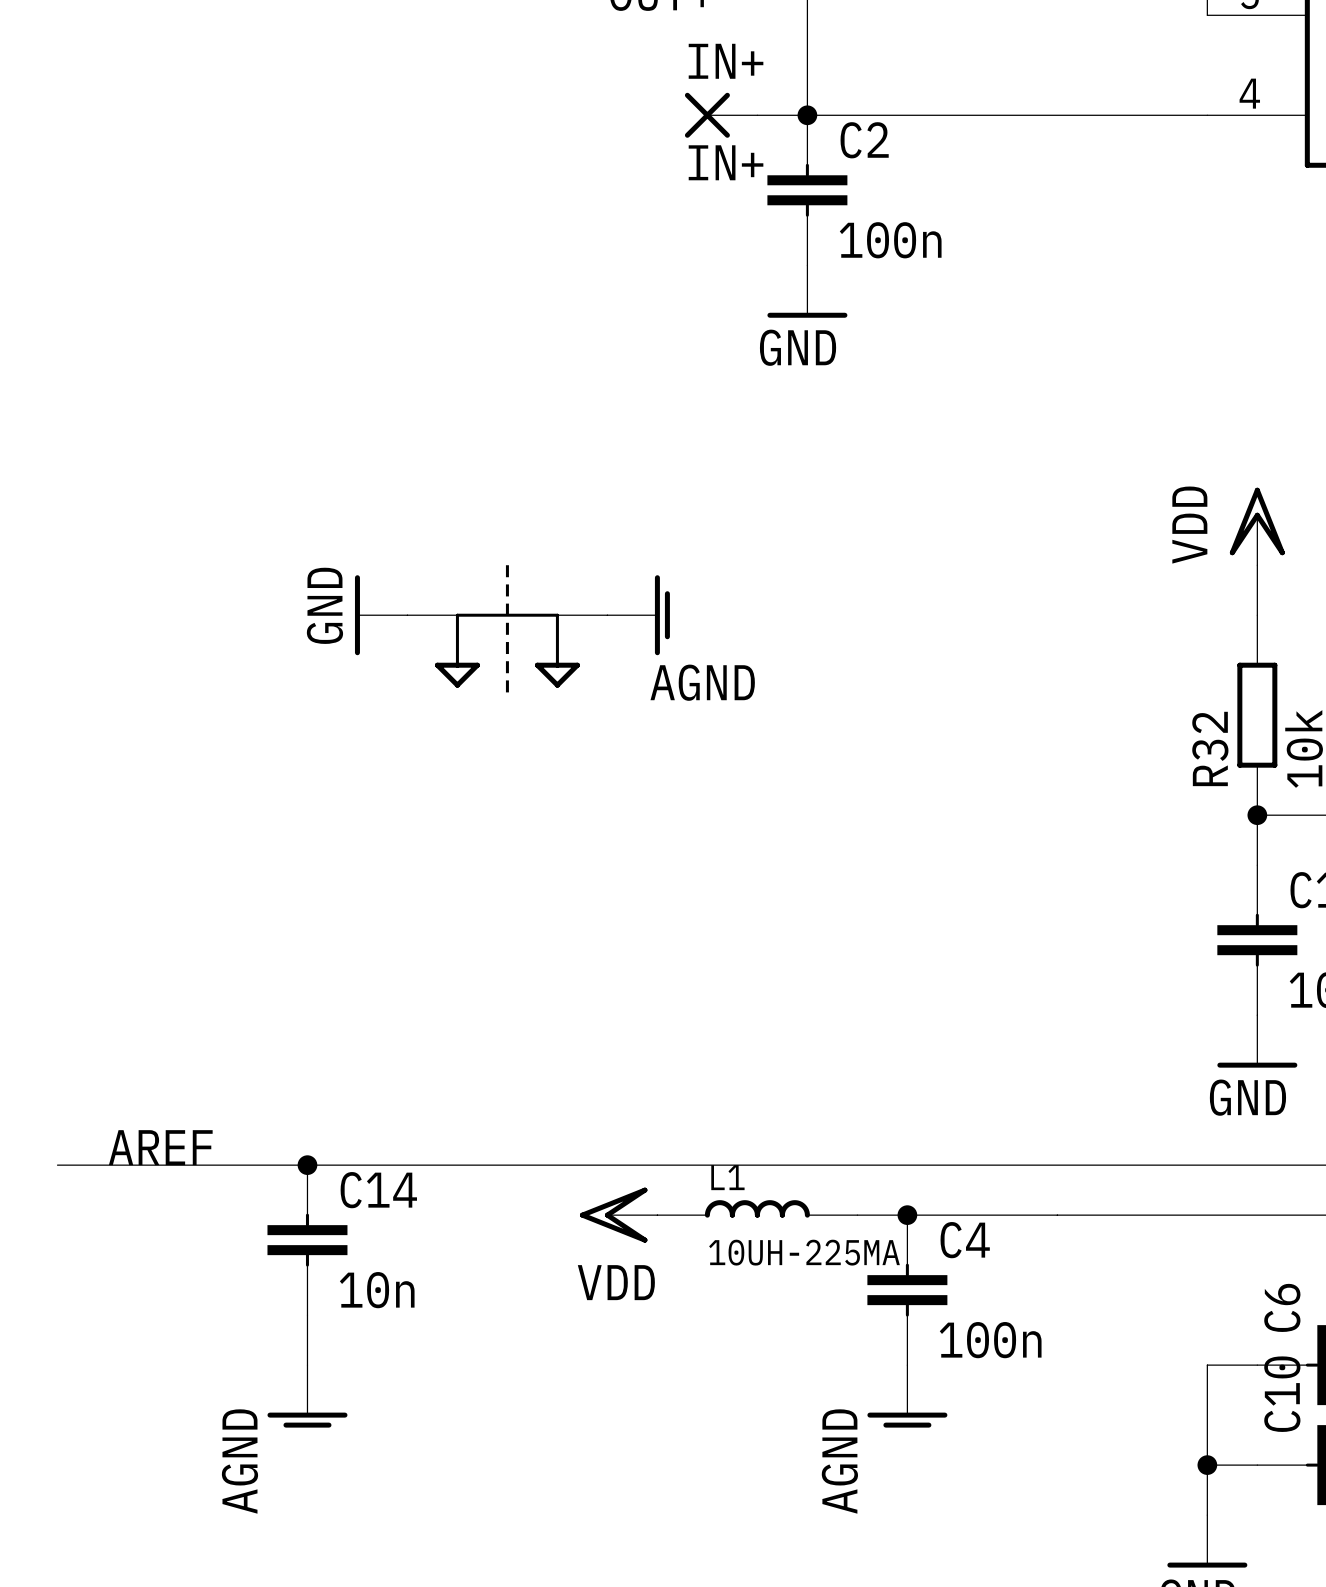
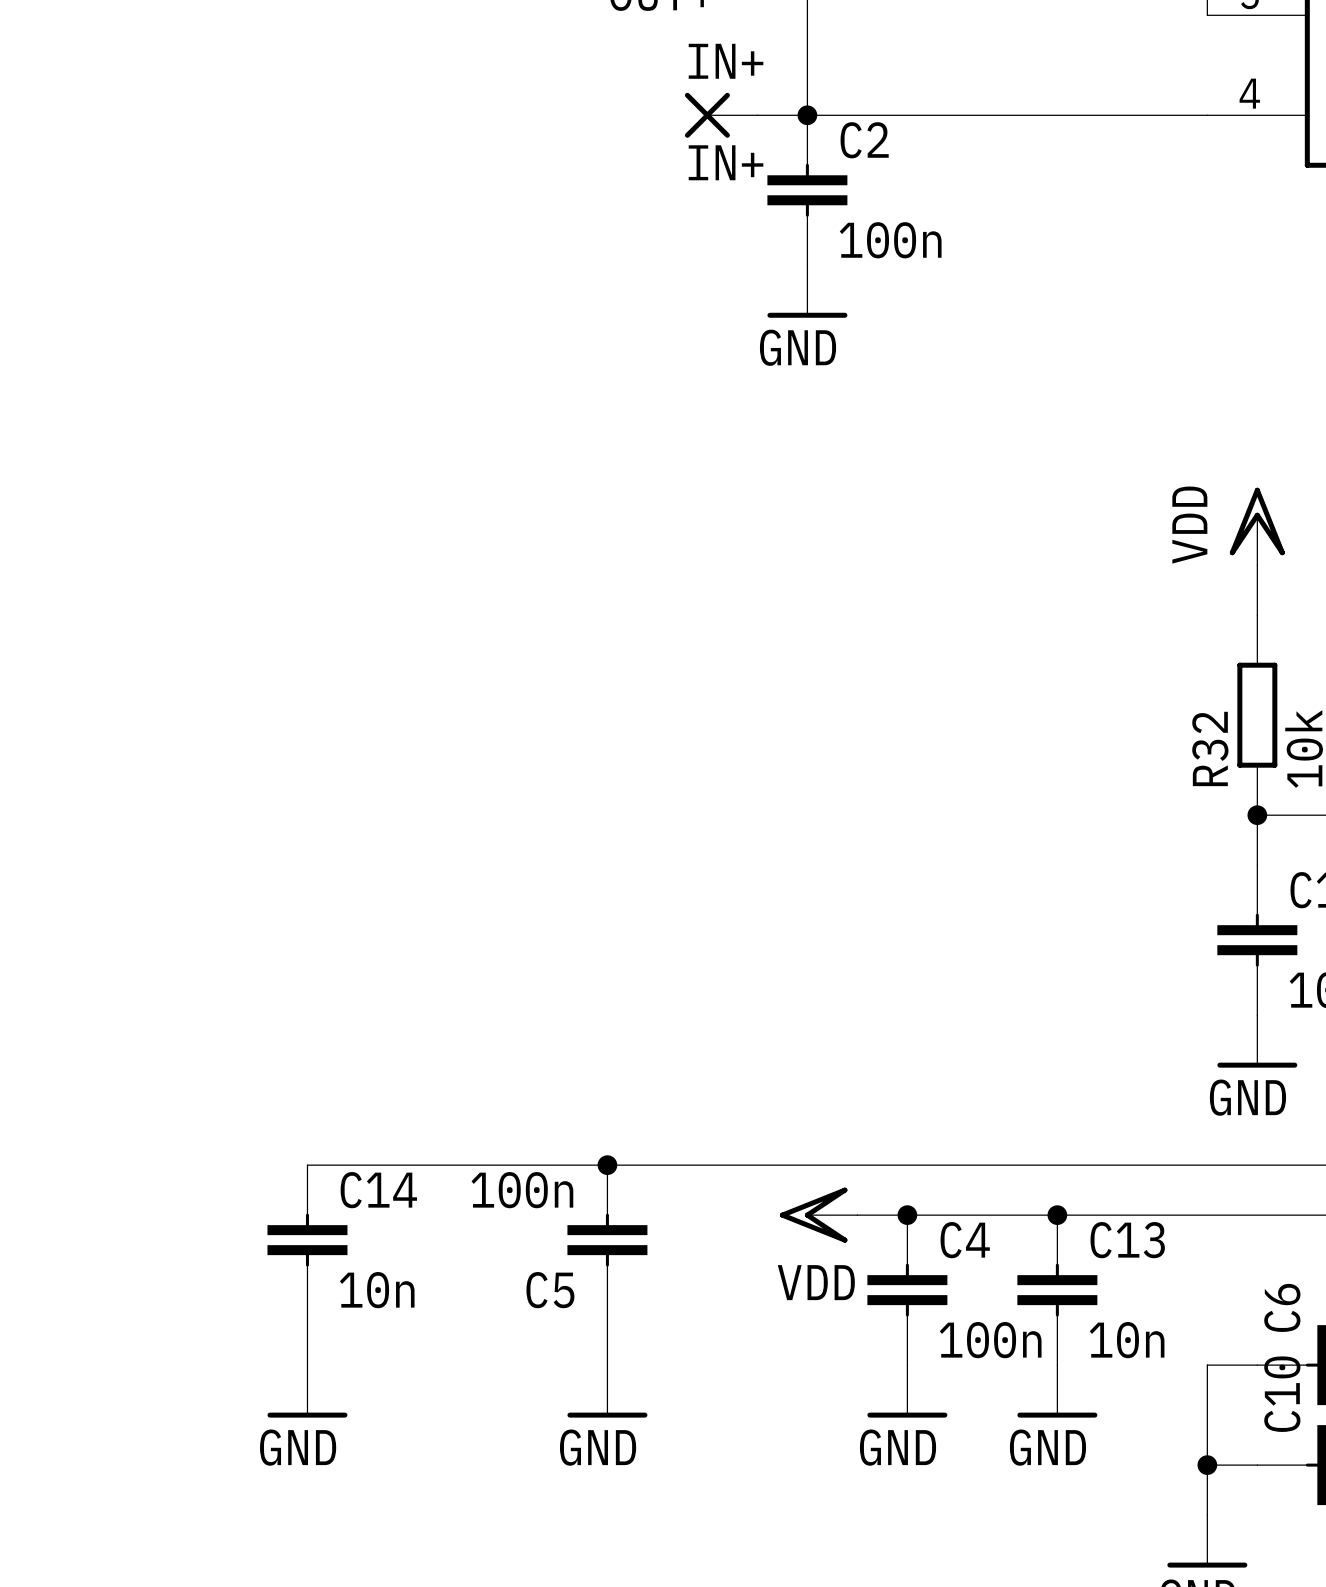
power symbol: GND (381, 615) -> none
power symbol: AGND (638, 615) -> none
part: (507, 630) -> none
label: AREF (160, 1147) -> none
wire: (57, 1165) (307, 1165) -> none
junction: (307, 1165) -> none
junction: none -> (607, 1165)
L1: 10UH-225MA (757, 1208) -> none
power symbol position: VDD (618, 1215) -> VDD (818, 1215)
junction: none -> (1057, 1215)
C5: none -> 100n (607, 1240)
C13: none -> 10n (1057, 1290)
wire: none -> (607, 1315) (607, 1365)
power symbol: none -> GND (607, 1391)
power symbol: none -> GND (1057, 1391)
power symbol: AGND (307, 1396) -> GND (307, 1391)
power symbol: AGND (907, 1396) -> GND (907, 1391)

